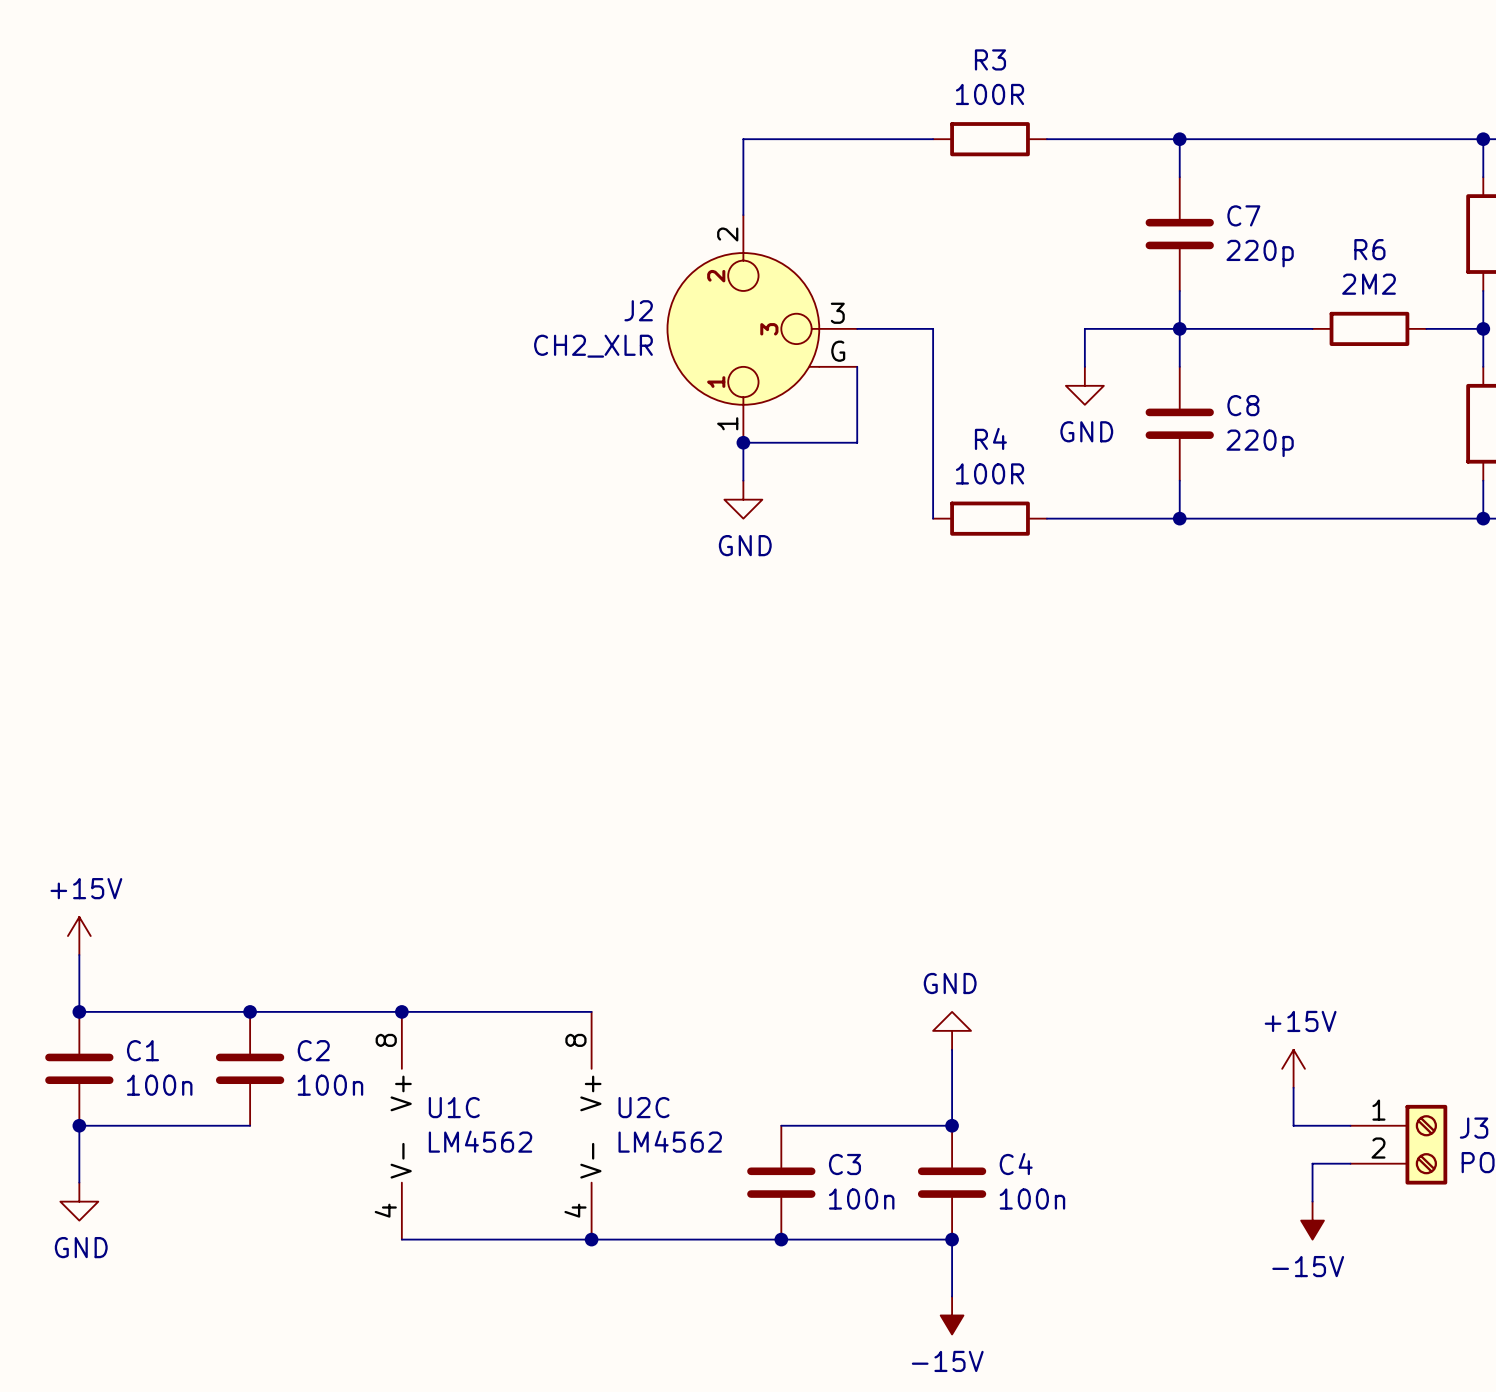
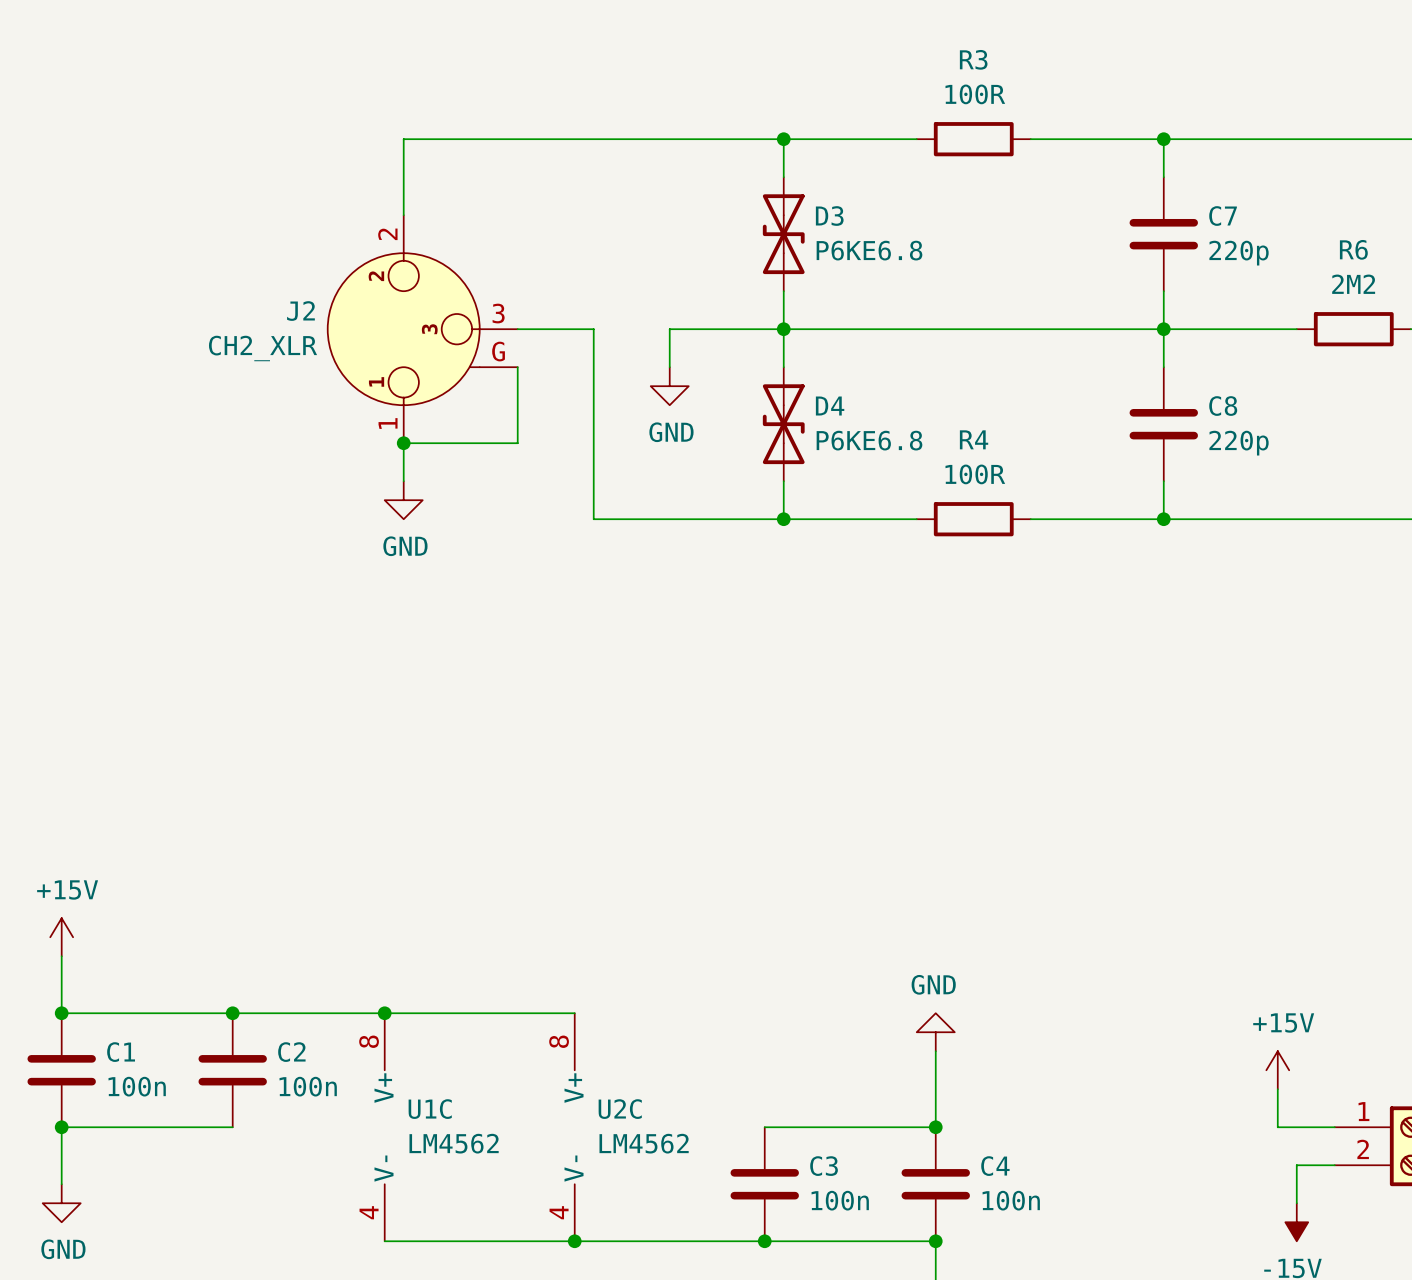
wire: (743, 139) (743, 215) -> (726, 139) (403, 139) (403, 215)
wire: none -> (783, 139) (783, 177)
junction: none -> (783, 139)
D3: none -> P6KE6.8 (783, 234)
J2 position: (762, 328) -> (422, 329)
junction: none -> (783, 329)
wire: (933, 328) (933, 518) -> (517, 329) (593, 329) (593, 519) (916, 519)
wire: (1084, 328) (1084, 366) -> (1068, 329) (916, 329)
wire: (857, 366) (857, 442) (743, 442) (743, 480) -> (517, 367) (517, 443) (403, 443) (403, 481)
power symbol: GND (1084, 385) -> none
D4: none -> P6KE6.8 (783, 424)
junction: none -> (403, 443)
junction: (743, 442) -> none
wire: none -> (783, 481) (783, 519)
power symbol: none -> GND (403, 500)
power symbol position: GND (743, 499) -> GND (669, 386)
junction: none -> (783, 519)

